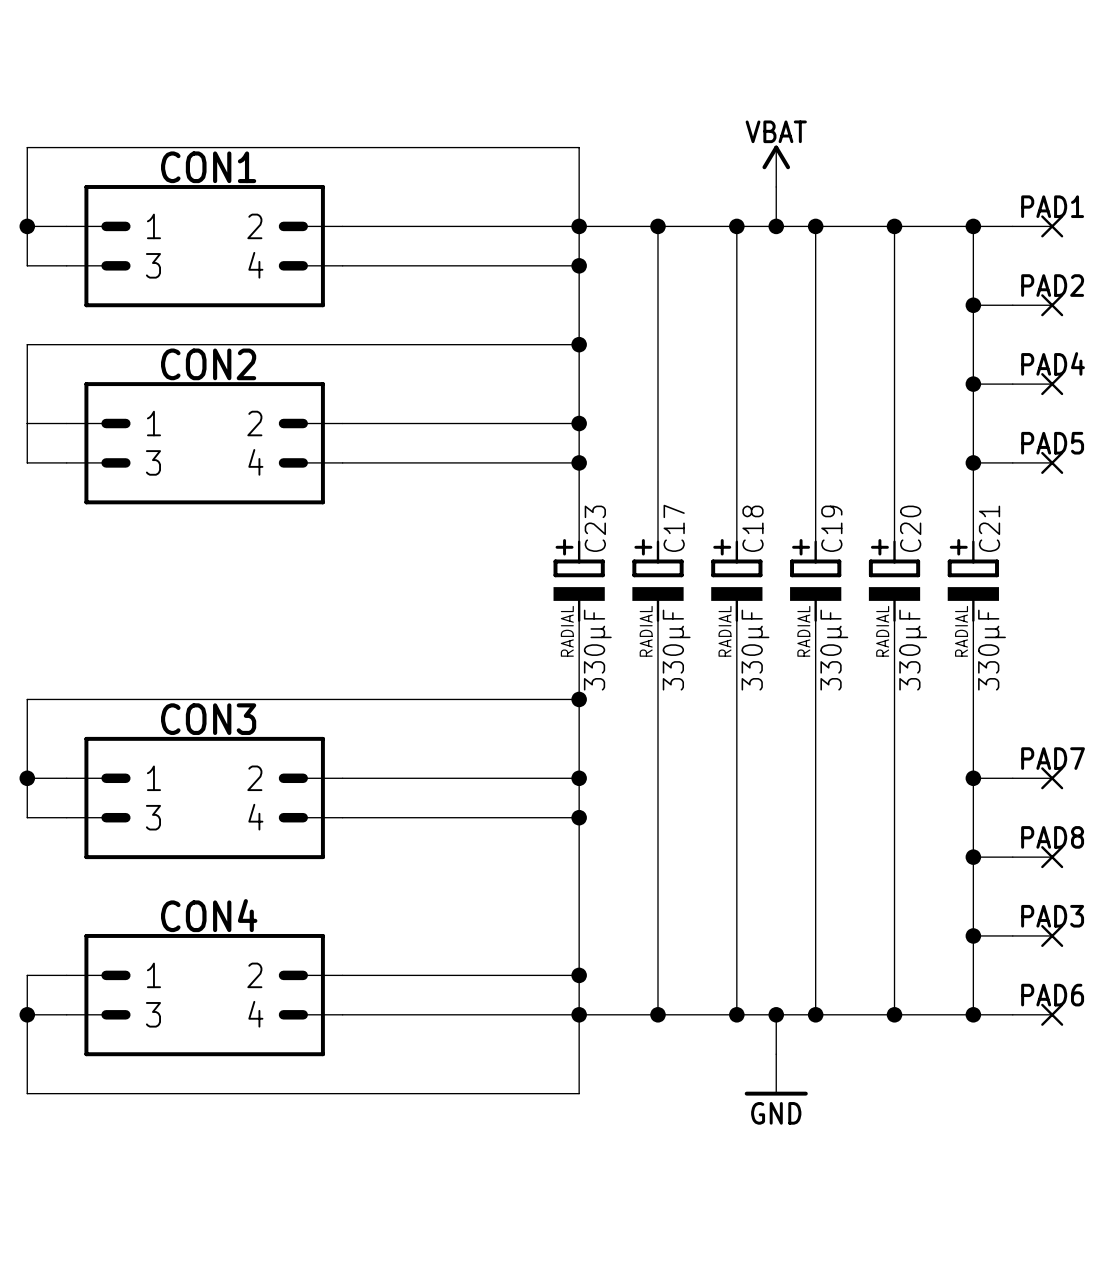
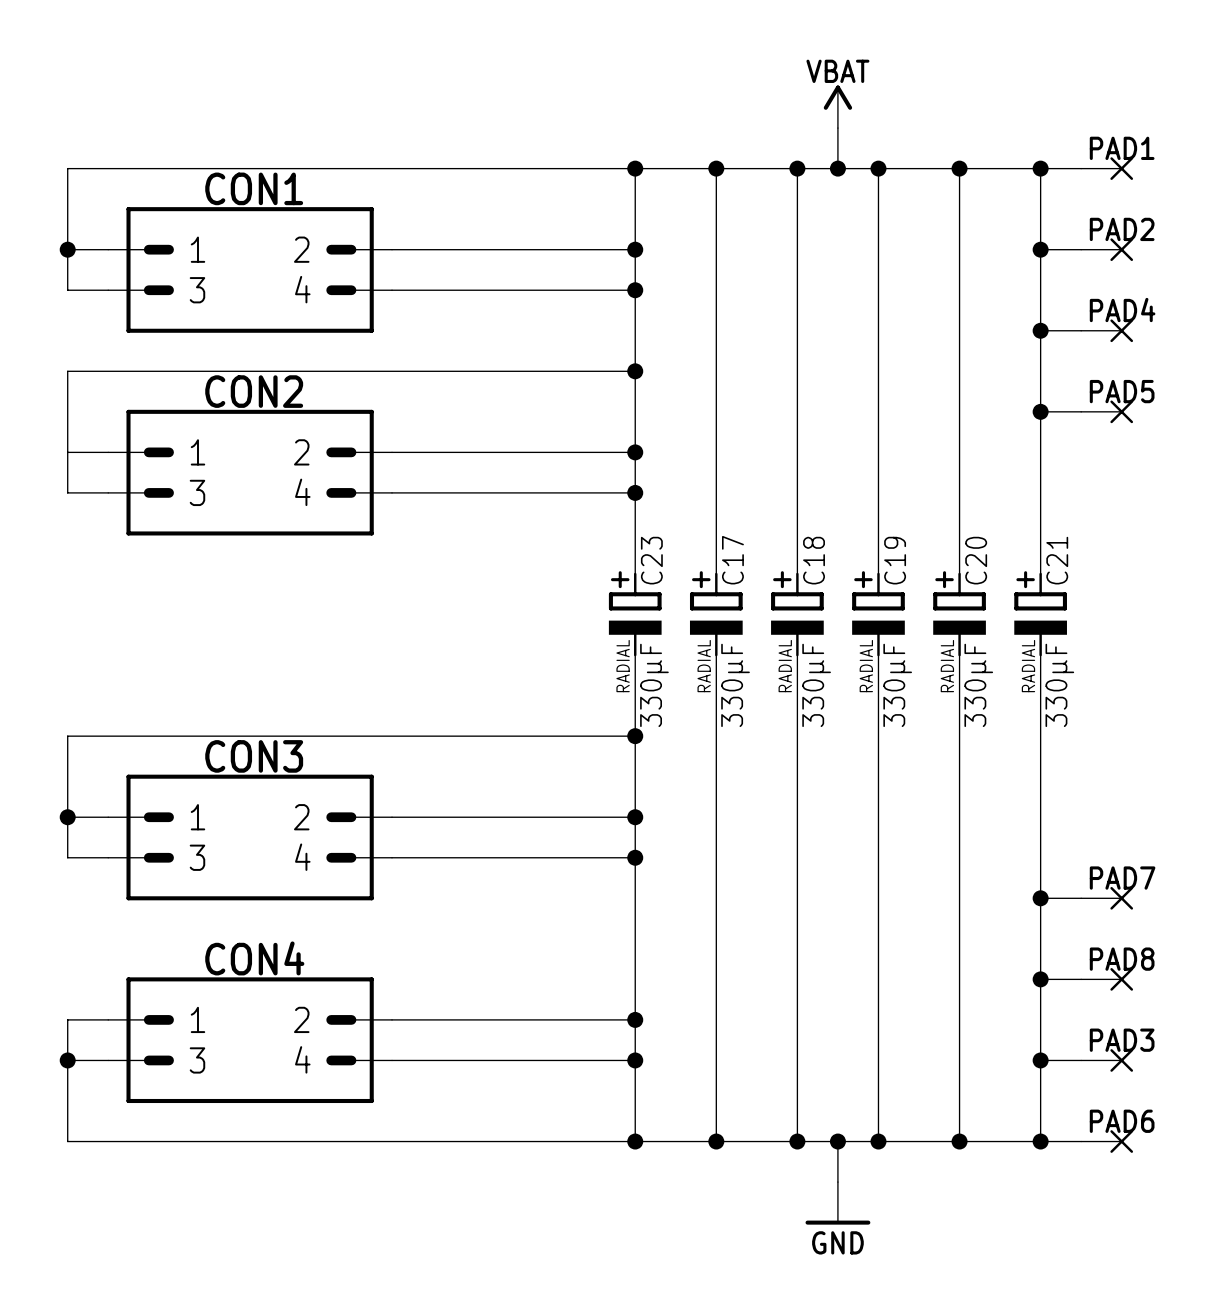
wire: none -> (635, 168) (1081, 168)
junction: none -> (635, 168)
wire: none -> (716, 168) (716, 249)
junction: none -> (716, 168)
wire: none -> (797, 168) (797, 249)
junction: none -> (797, 168)
junction: none -> (837, 168)
wire: none -> (878, 168) (878, 249)
junction: none -> (878, 168)
wire: none -> (959, 168) (959, 249)
junction: none -> (959, 168)
junction: none -> (1040, 168)
PAD1: none -> (1107, 168)
power symbol position: VBAT (776, 166) -> VBAT (837, 106)
wire: (776, 186) (776, 226) -> (837, 128) (837, 168)
PAD1 name: PAD1 (1052, 206) -> PAD2 (1122, 229)
wire: (579, 226) (973, 226) -> (1040, 168) (1040, 249)
junction: (657, 226) -> none
junction: (736, 226) -> none
junction: (776, 226) -> none
junction: (815, 226) -> none
junction: (894, 226) -> none
PAD2 name: PAD2 (1052, 285) -> PAD4 (1122, 310)
PAD4 name: PAD4 (1053, 363) -> PAD5 (1122, 391)
wire: (973, 462) (1012, 462) -> none
junction: (973, 462) -> none
PAD5: (1038, 462) -> none
wire: (973, 778) (1012, 778) -> none
junction: (973, 778) -> none
PAD7: (1038, 778) -> none
PAD8 name: PAD8 (1052, 837) -> PAD7 (1122, 878)
PAD3 name: PAD3 (1052, 916) -> PAD8 (1122, 959)
PAD6 name: PAD6 (1052, 995) -> PAD3 (1122, 1040)
wire: (579, 1014) (973, 1014) -> (1040, 1141) (1040, 1060)
wire: none -> (716, 1060) (716, 1141)
junction: (657, 1014) -> none
wire: none -> (797, 1060) (797, 1141)
junction: (736, 1014) -> none
wire: (776, 1014) (776, 1054) -> (837, 1141) (837, 1182)
junction: (776, 1014) -> none
wire: none -> (878, 1060) (878, 1141)
junction: (815, 1014) -> none
wire: none -> (959, 1060) (959, 1141)
junction: (894, 1014) -> none
power symbol position: GND (776, 1074) -> GND (837, 1203)
wire: none -> (635, 1141) (1081, 1141)
junction: none -> (635, 1141)
junction: none -> (716, 1141)
junction: none -> (797, 1141)
junction: none -> (837, 1141)
junction: none -> (878, 1141)
junction: none -> (959, 1141)
junction: none -> (1040, 1141)
PAD6: none -> (1107, 1141)

